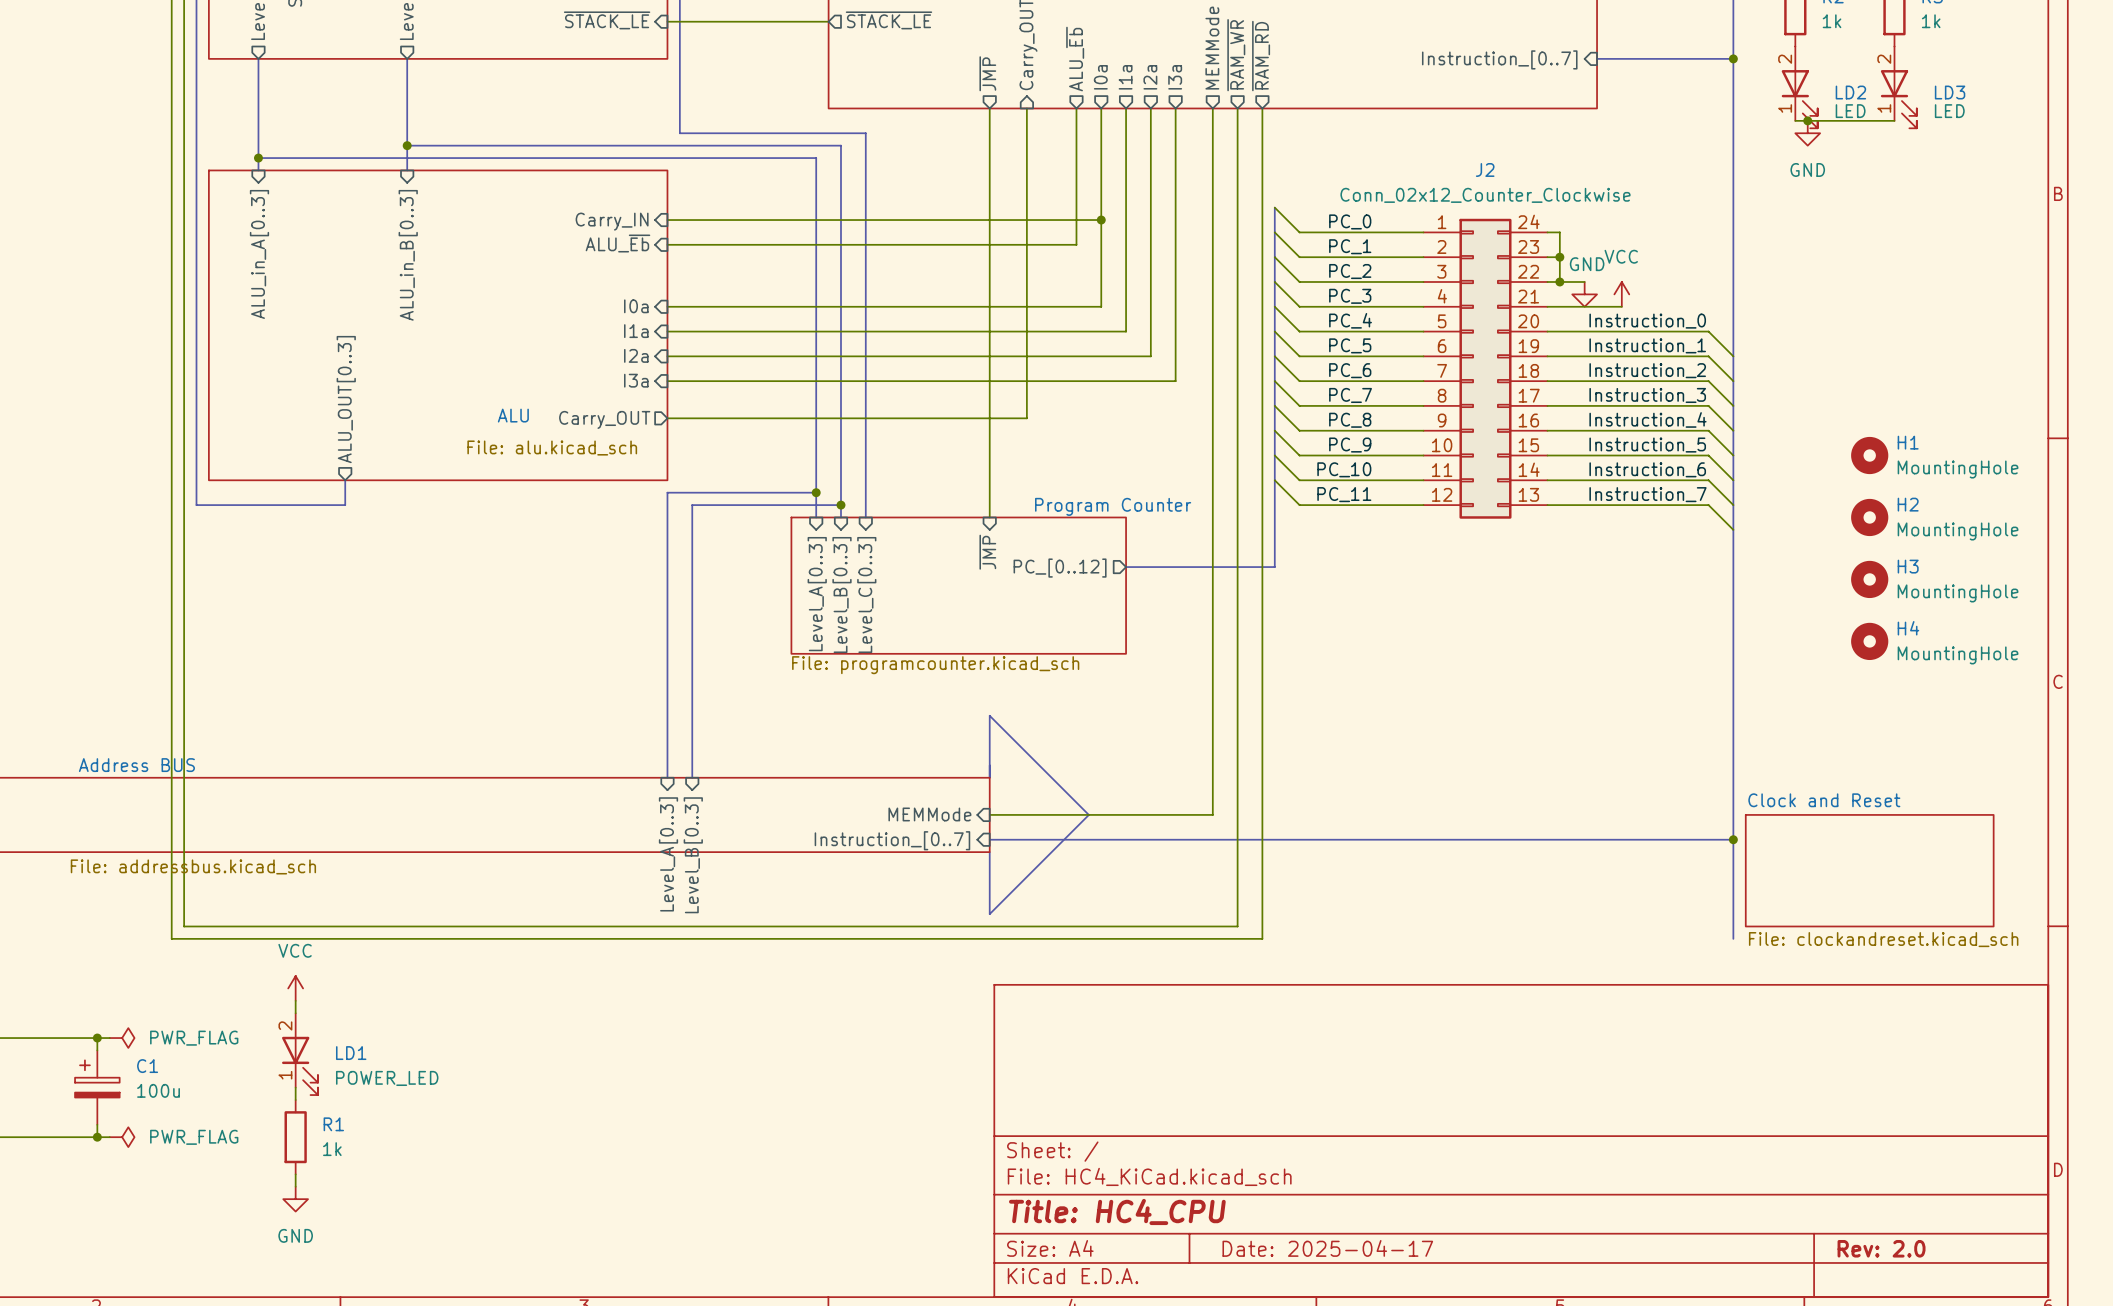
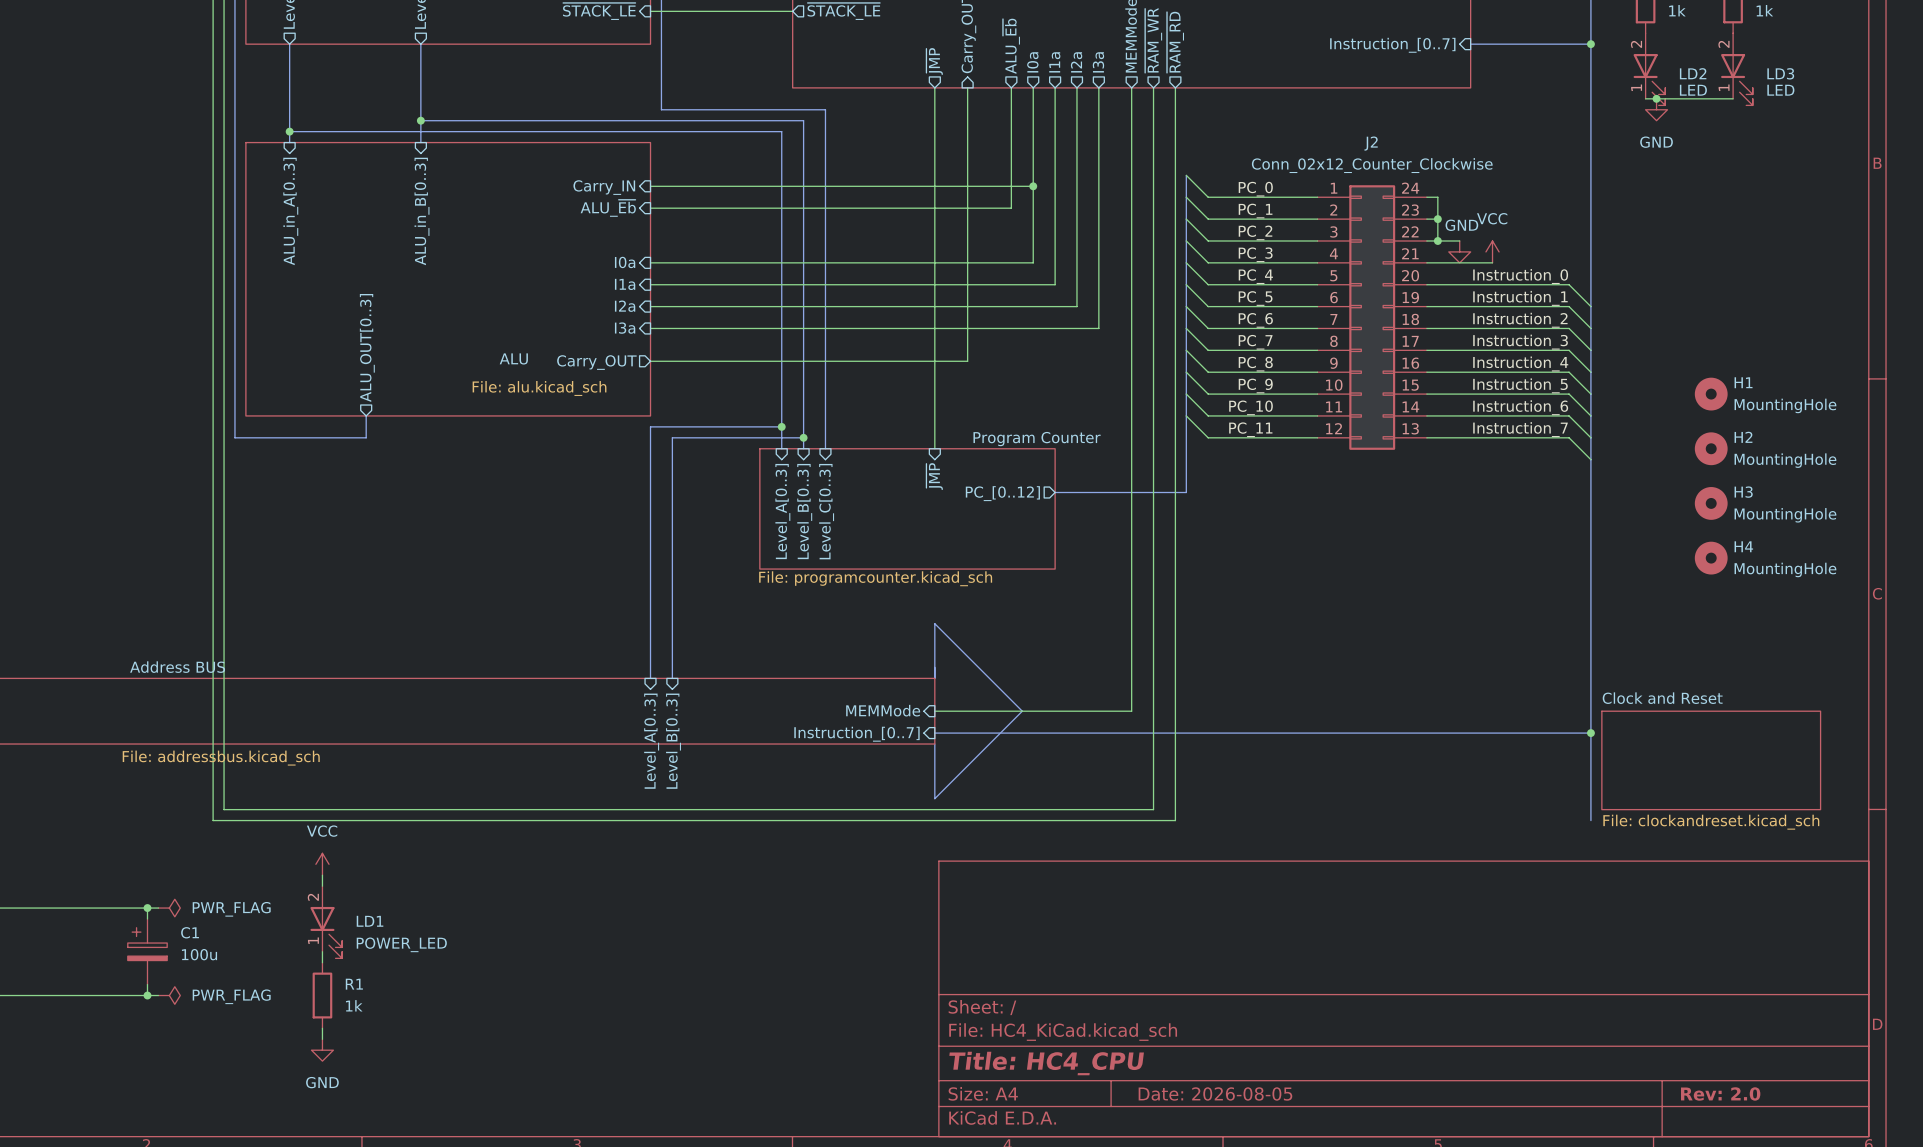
title block: Date: 2025-04-17 (1327, 1248) -> Date: 2026-08-05 (1215, 1093)

